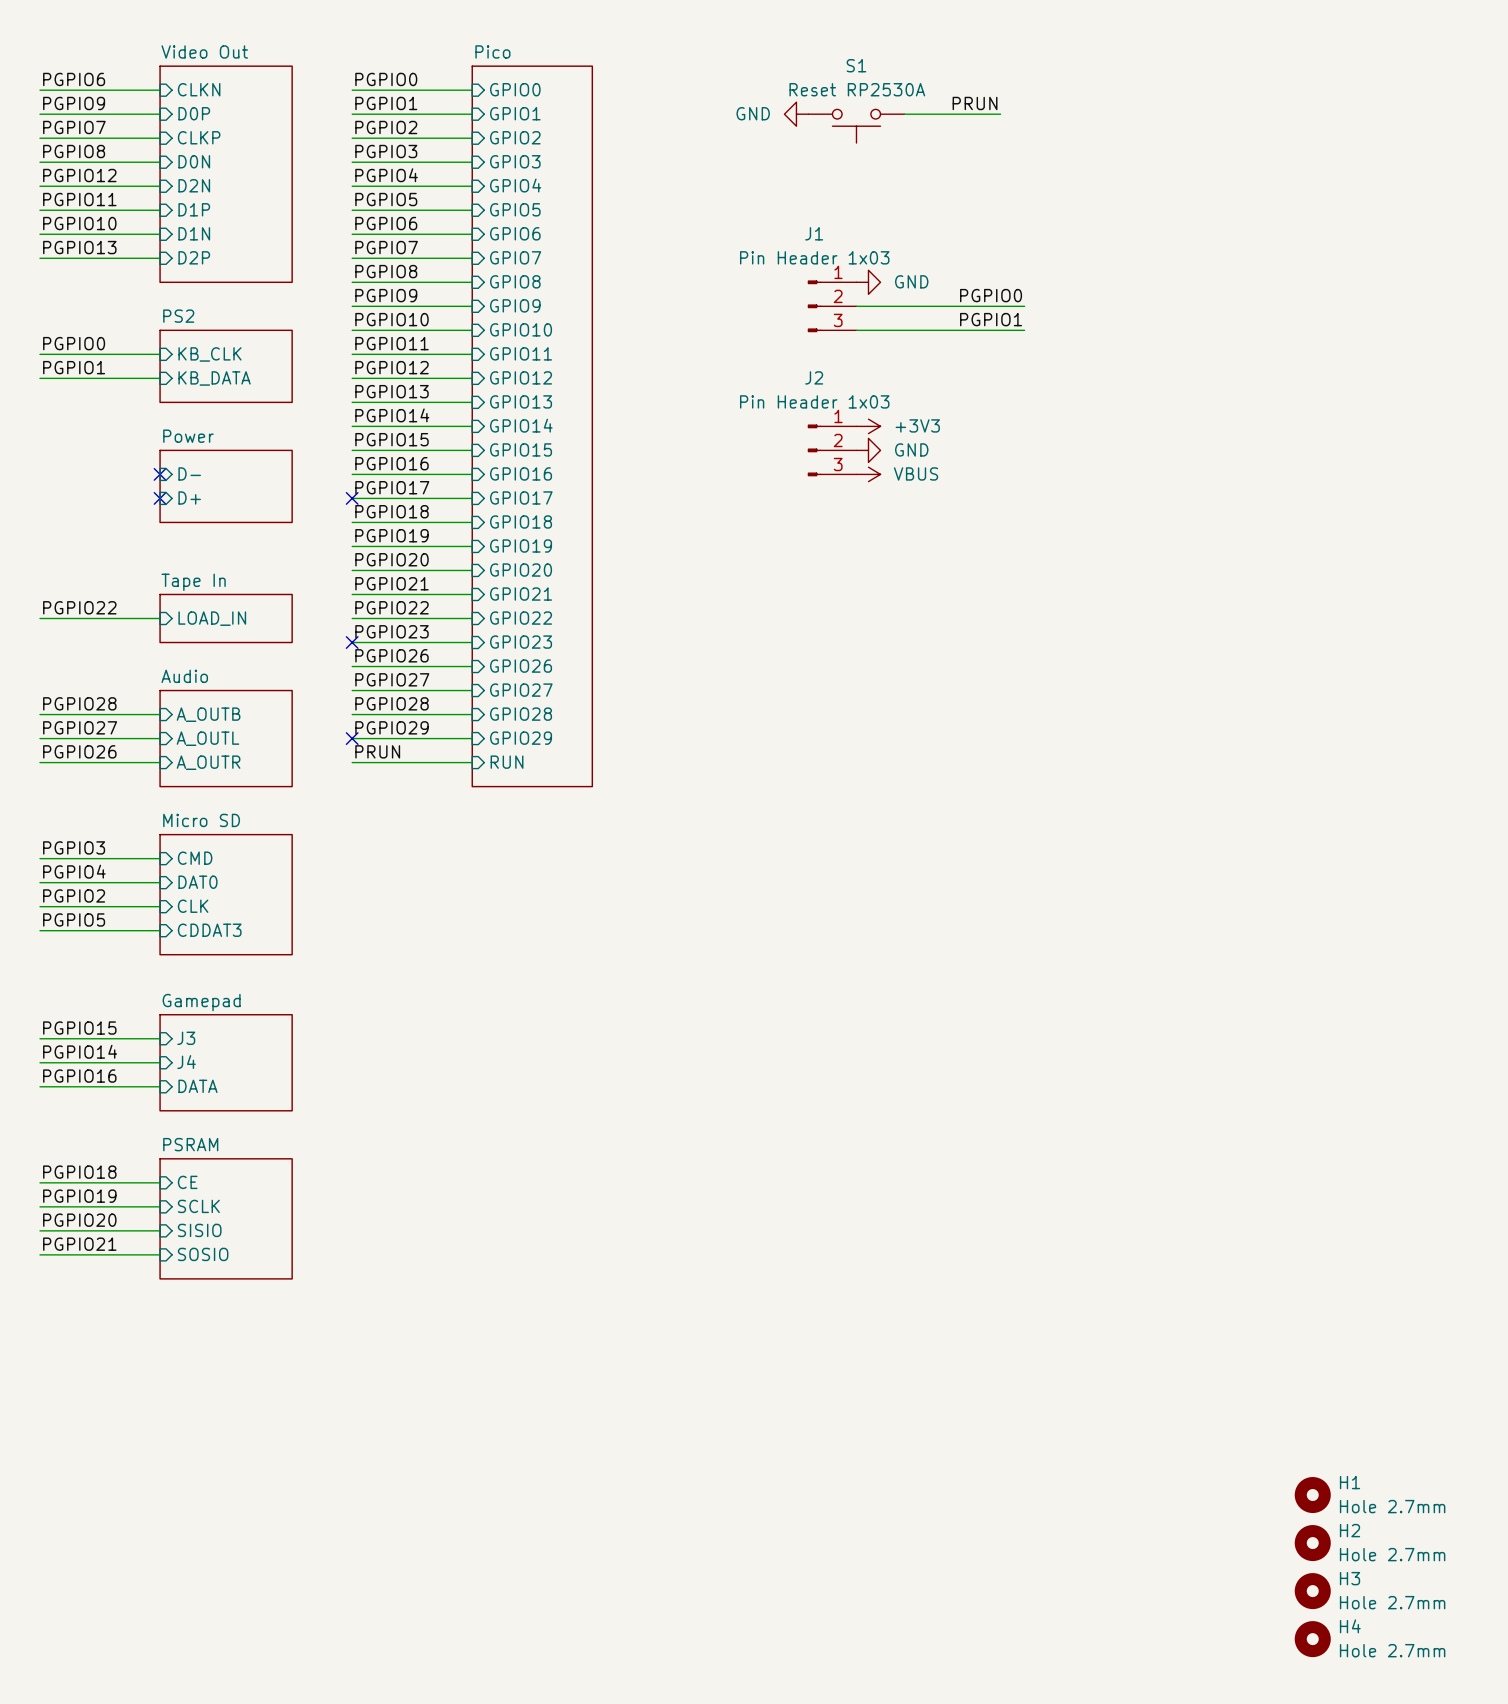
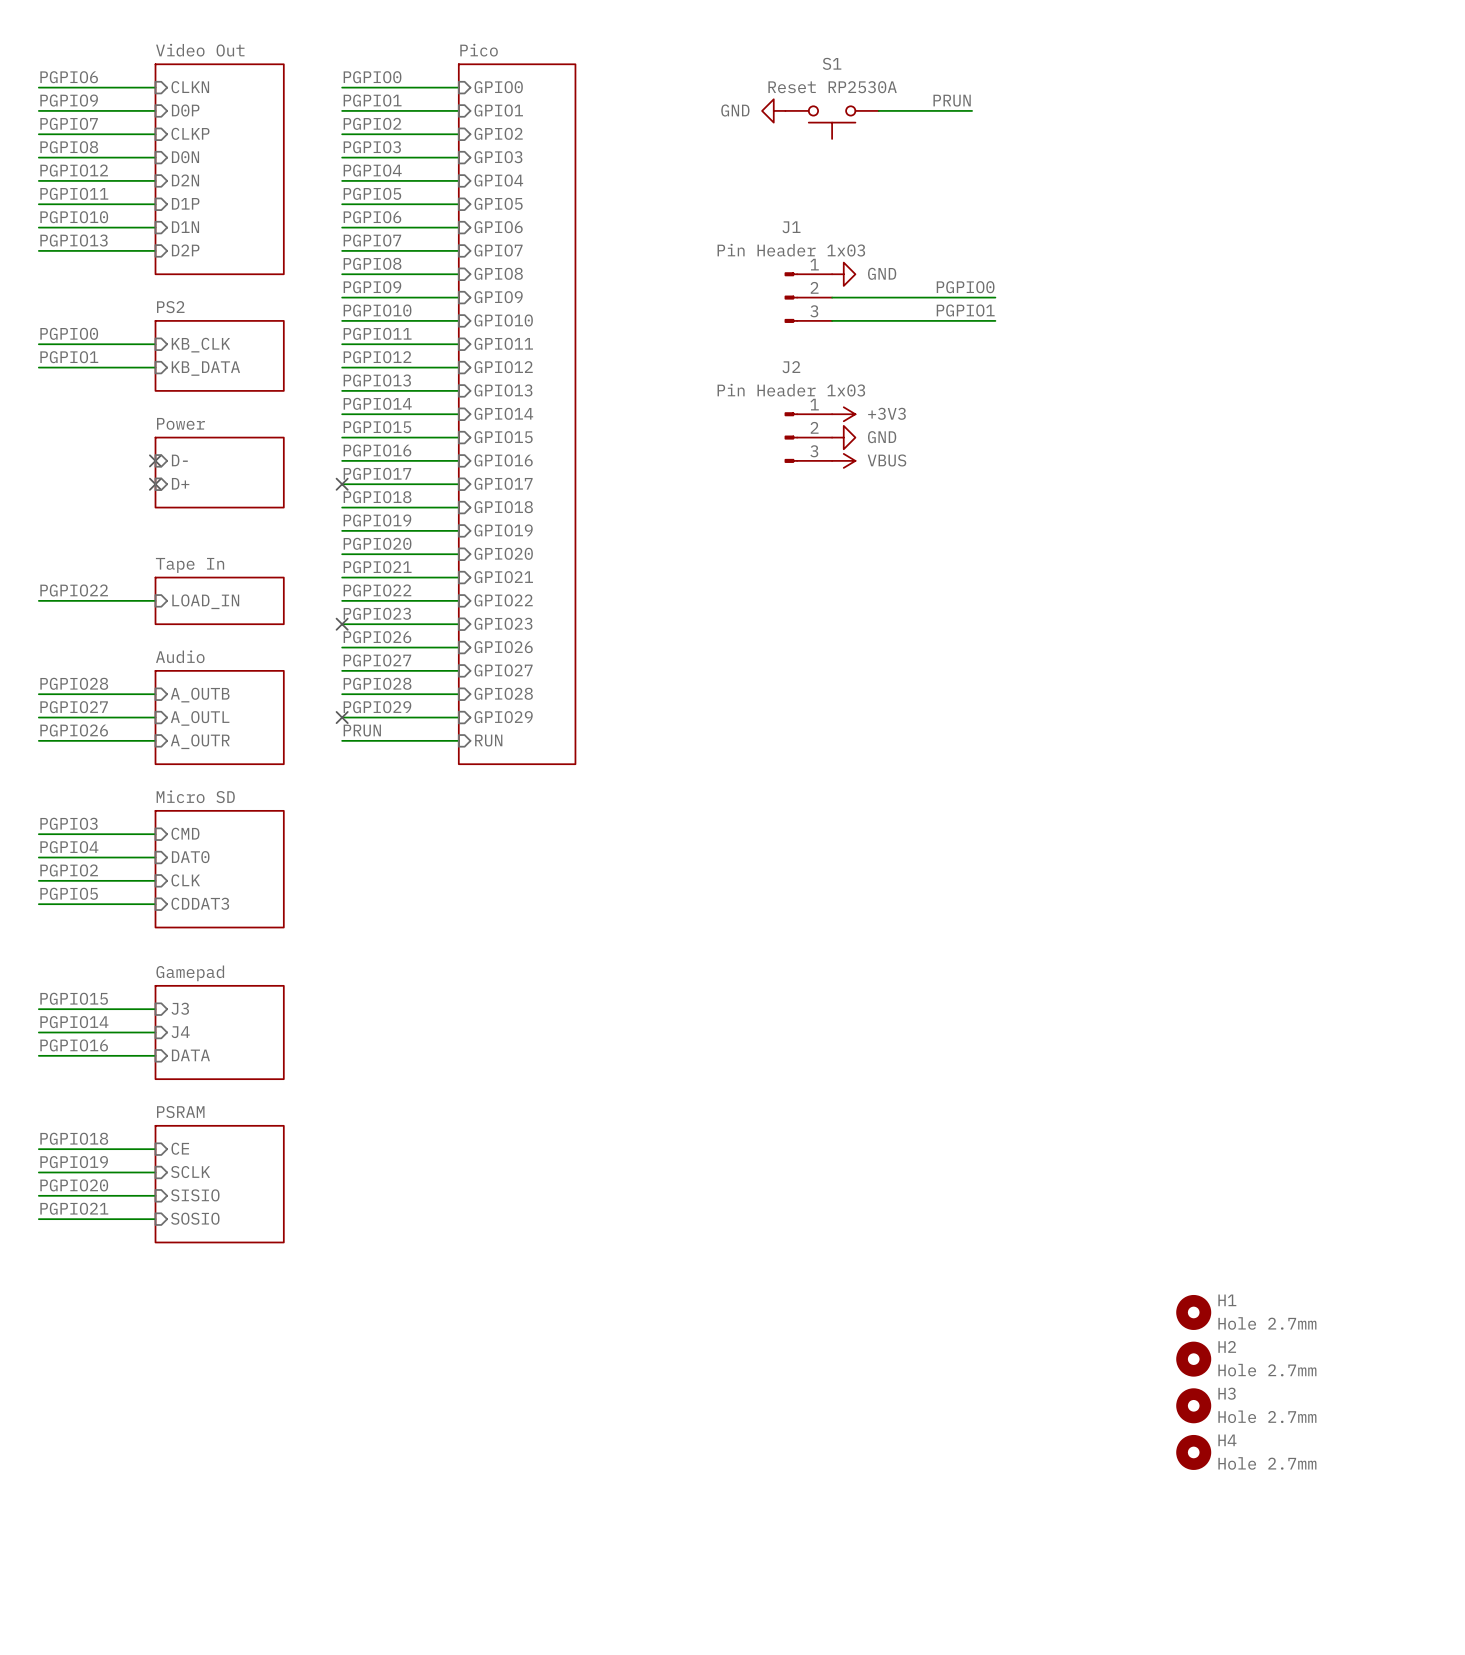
H1 position: (1312, 1495) -> (1193, 1312)
H2 position: (1312, 1543) -> (1193, 1359)
H3 position: (1312, 1591) -> (1193, 1405)
H4 position: (1312, 1639) -> (1193, 1452)

